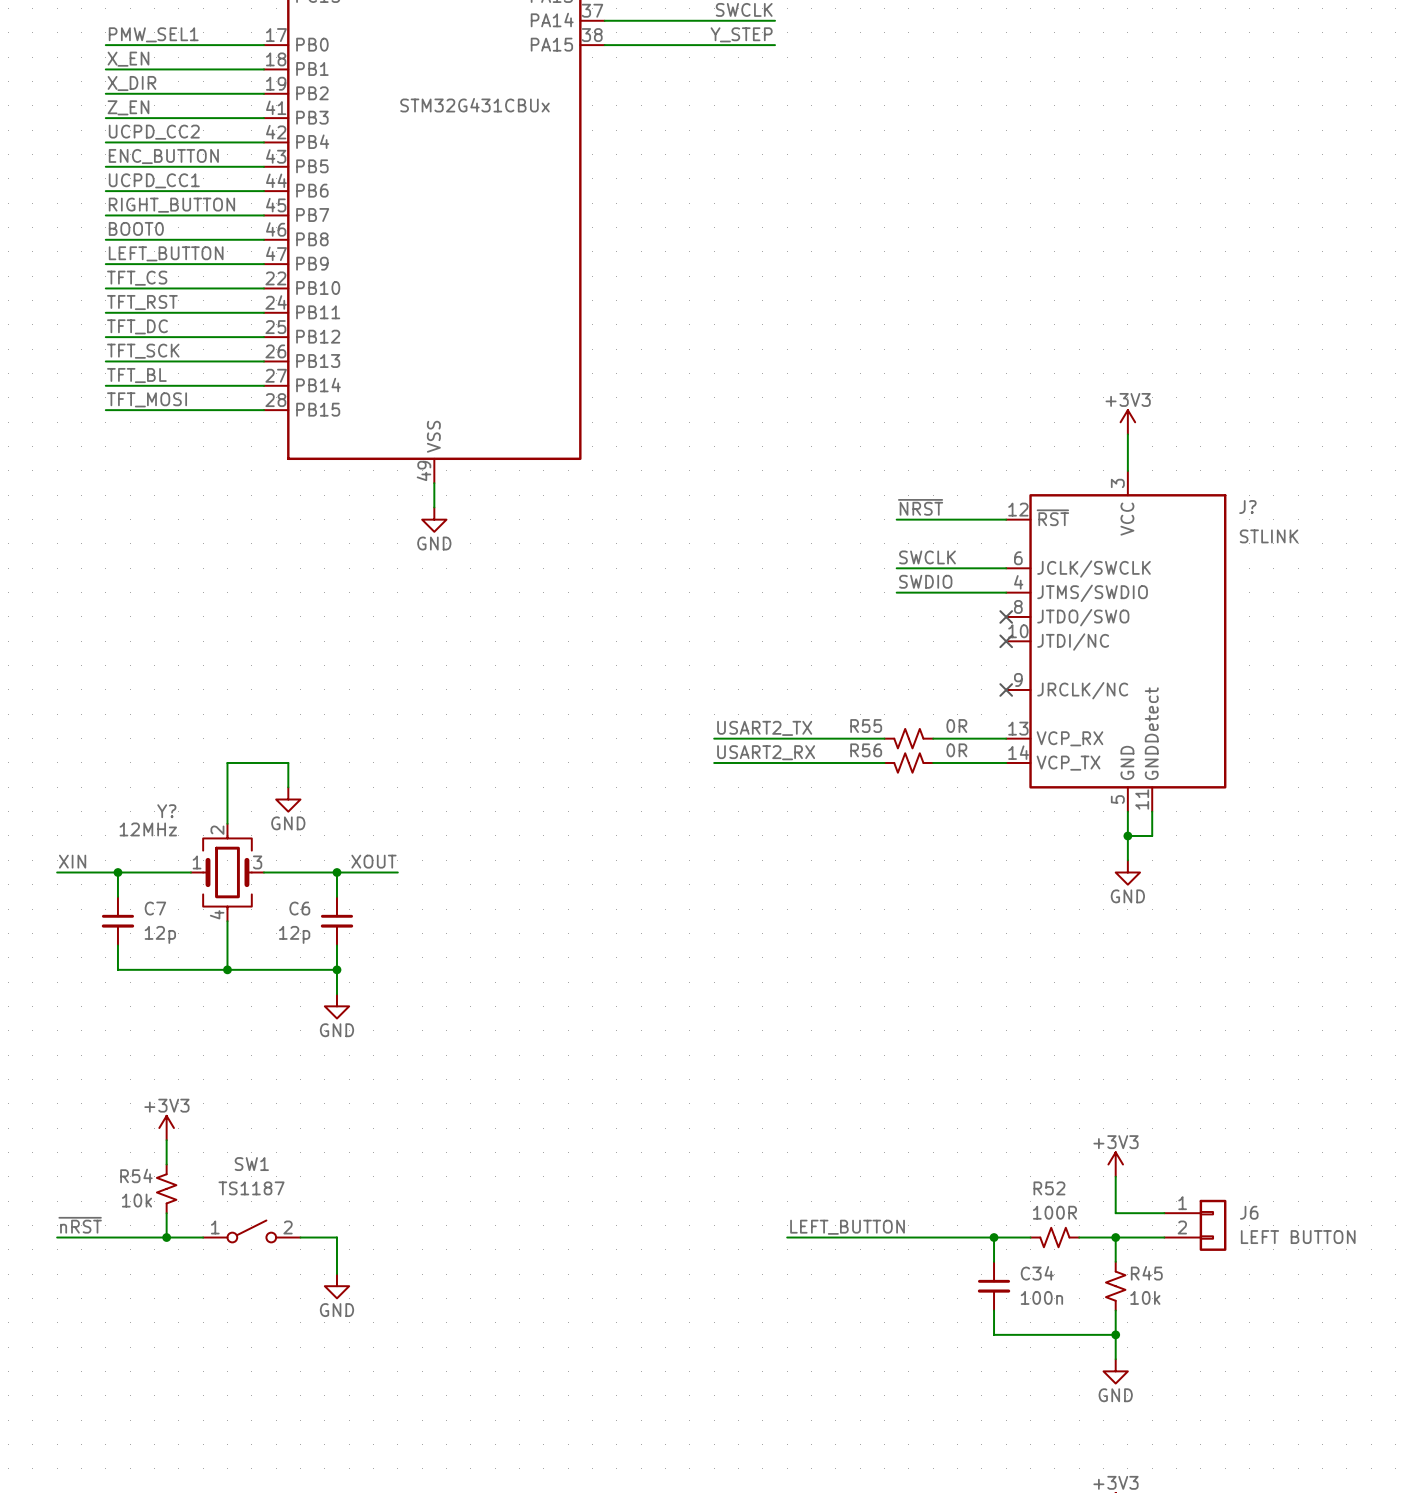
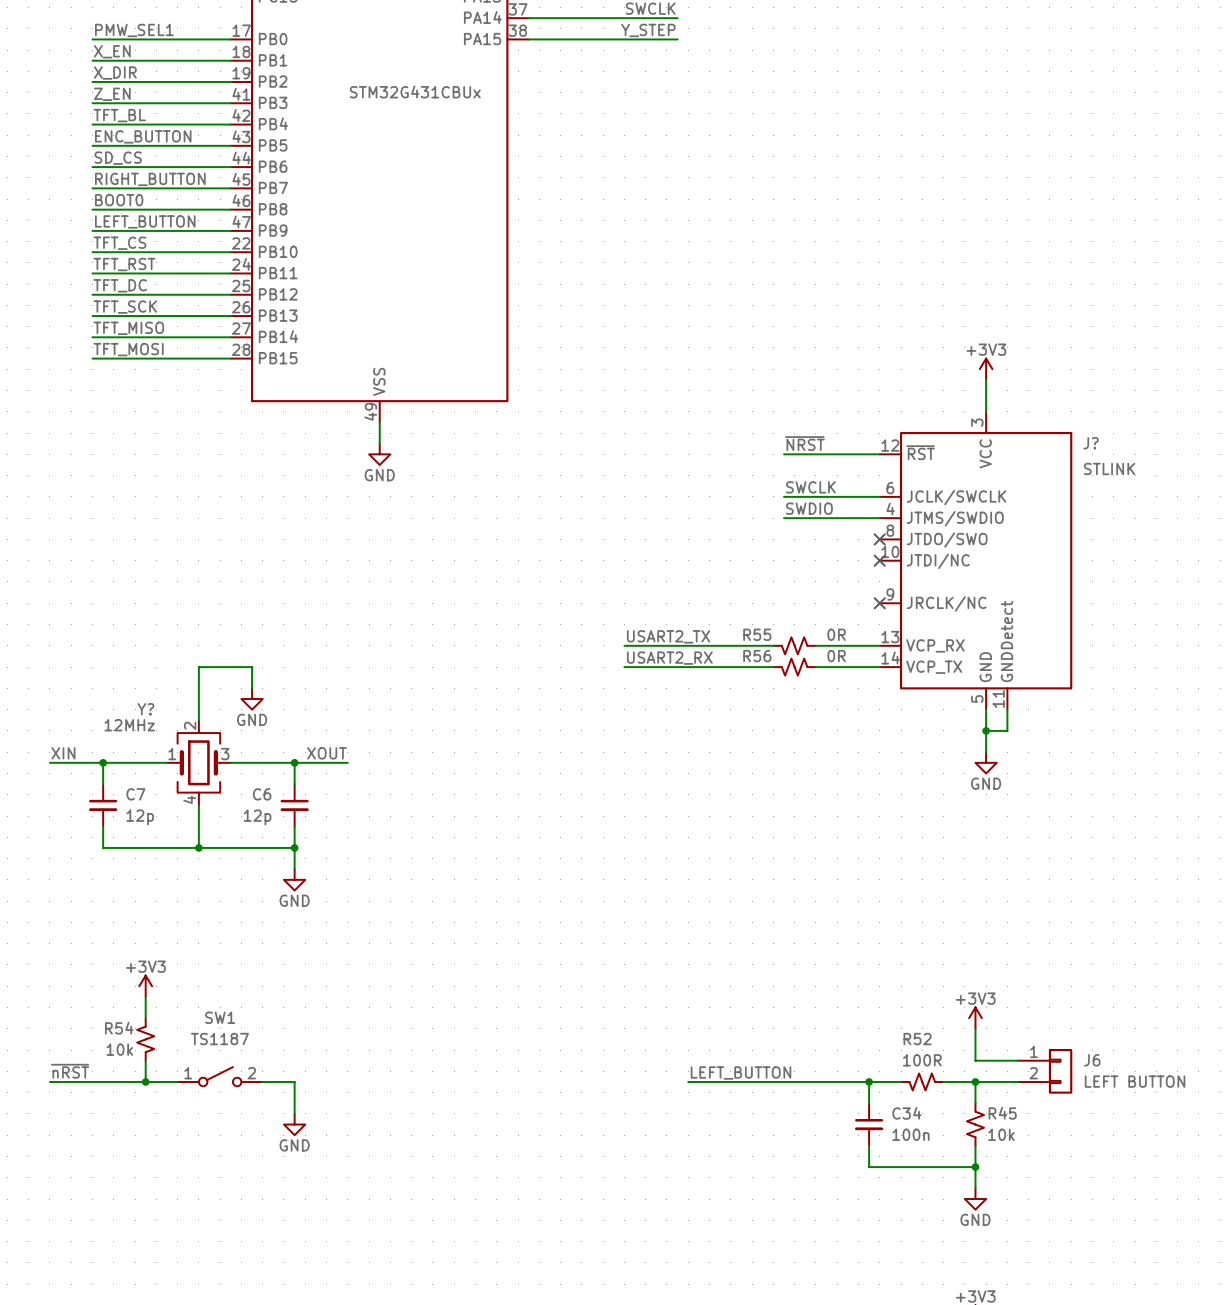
label: UCPD_CC2 (154, 132) -> TFT_BL (119, 115)
label: UCPD_CC1 (154, 180) -> SD_CS (118, 158)
label: TFT_BL (136, 375) -> TFT_MISO (128, 328)

